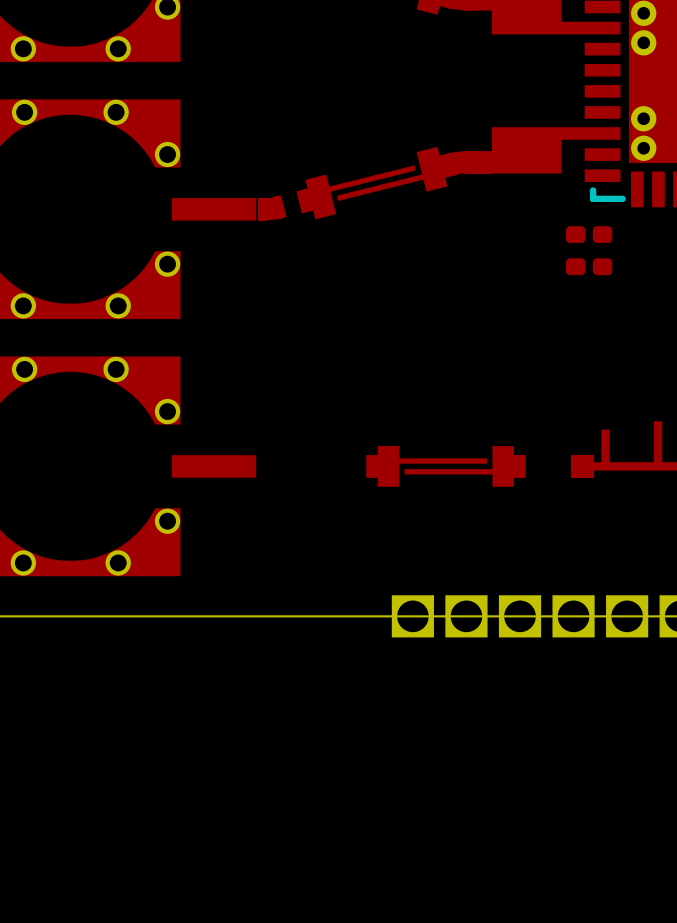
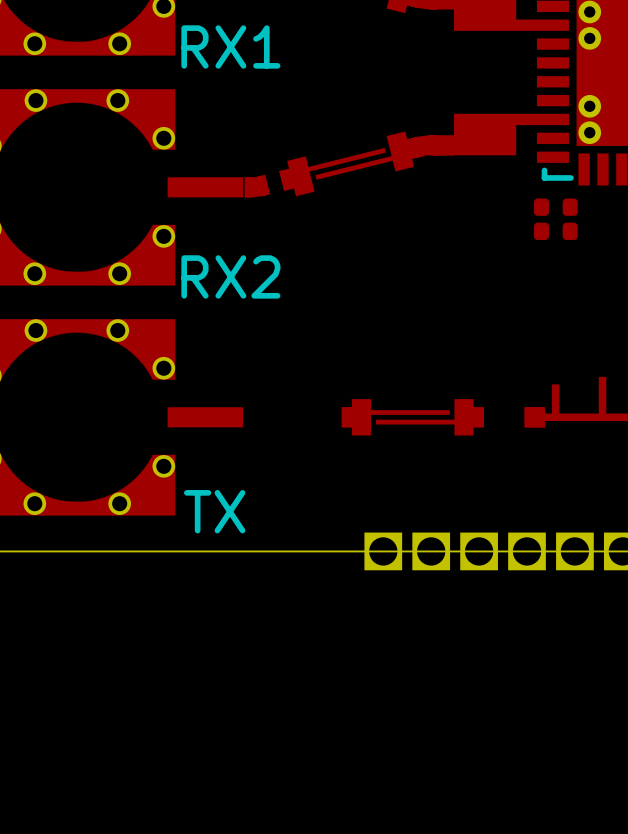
text: none -> RX1 (230, 46)
part rotation: 0° (589, 234) -> 90° clockwise (541, 219)
part rotation: 0° (589, 266) -> 90° clockwise (570, 219)
part position: (589, 266) -> (570, 219)
text: none -> RX2 (230, 276)
text: none -> TX (214, 511)

